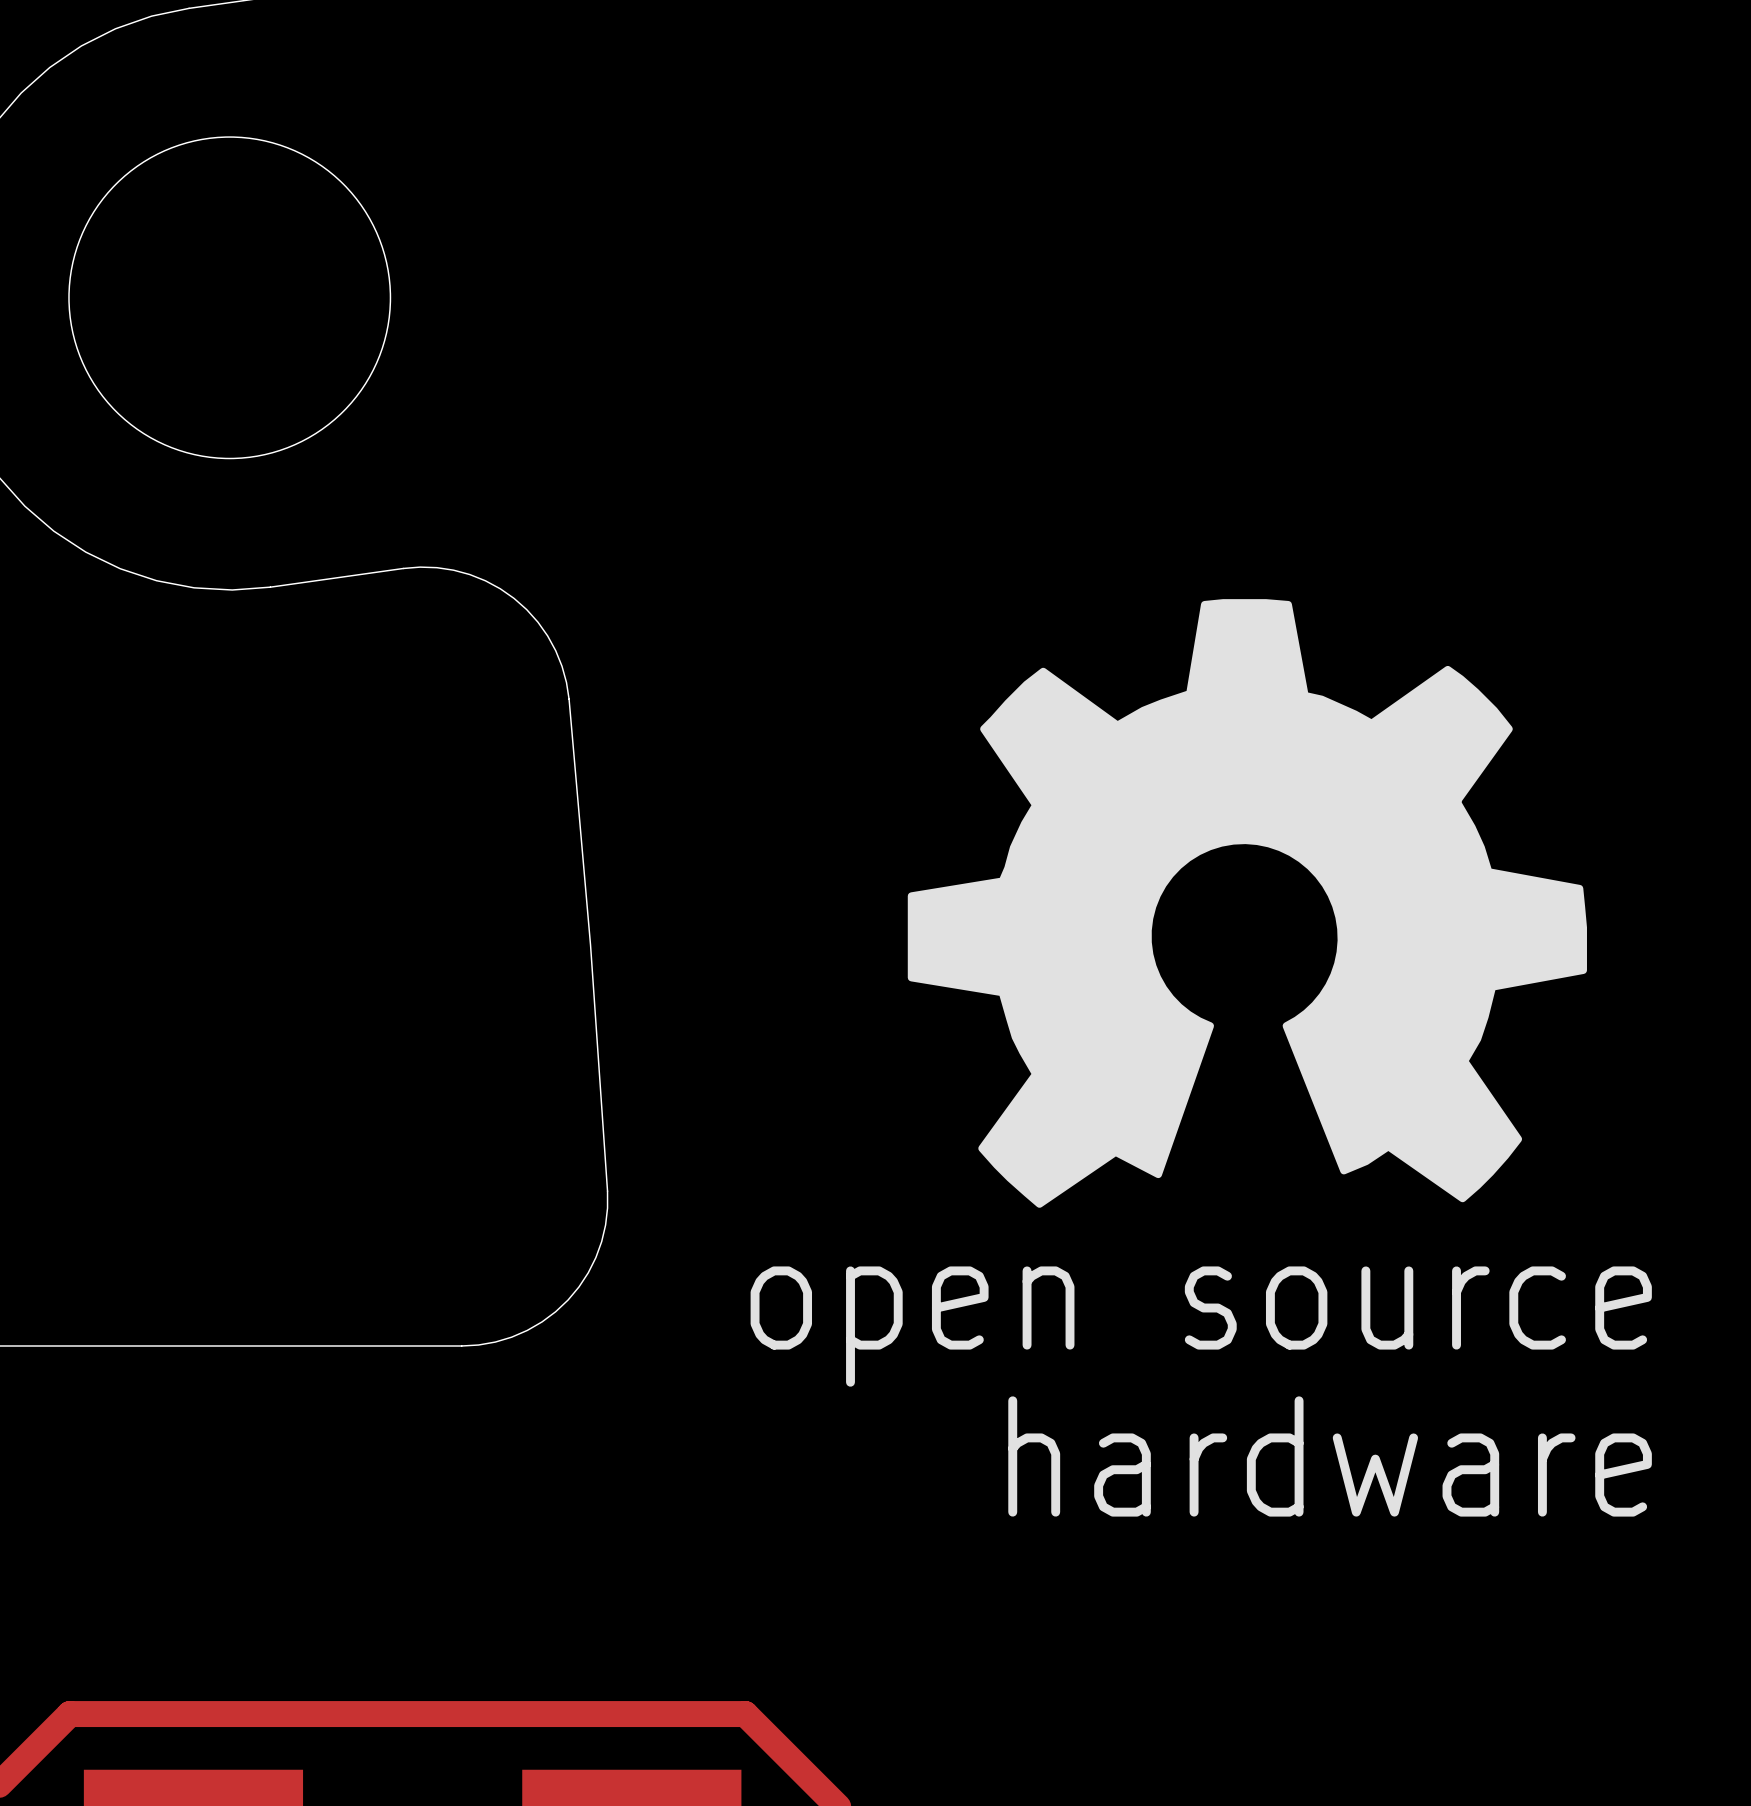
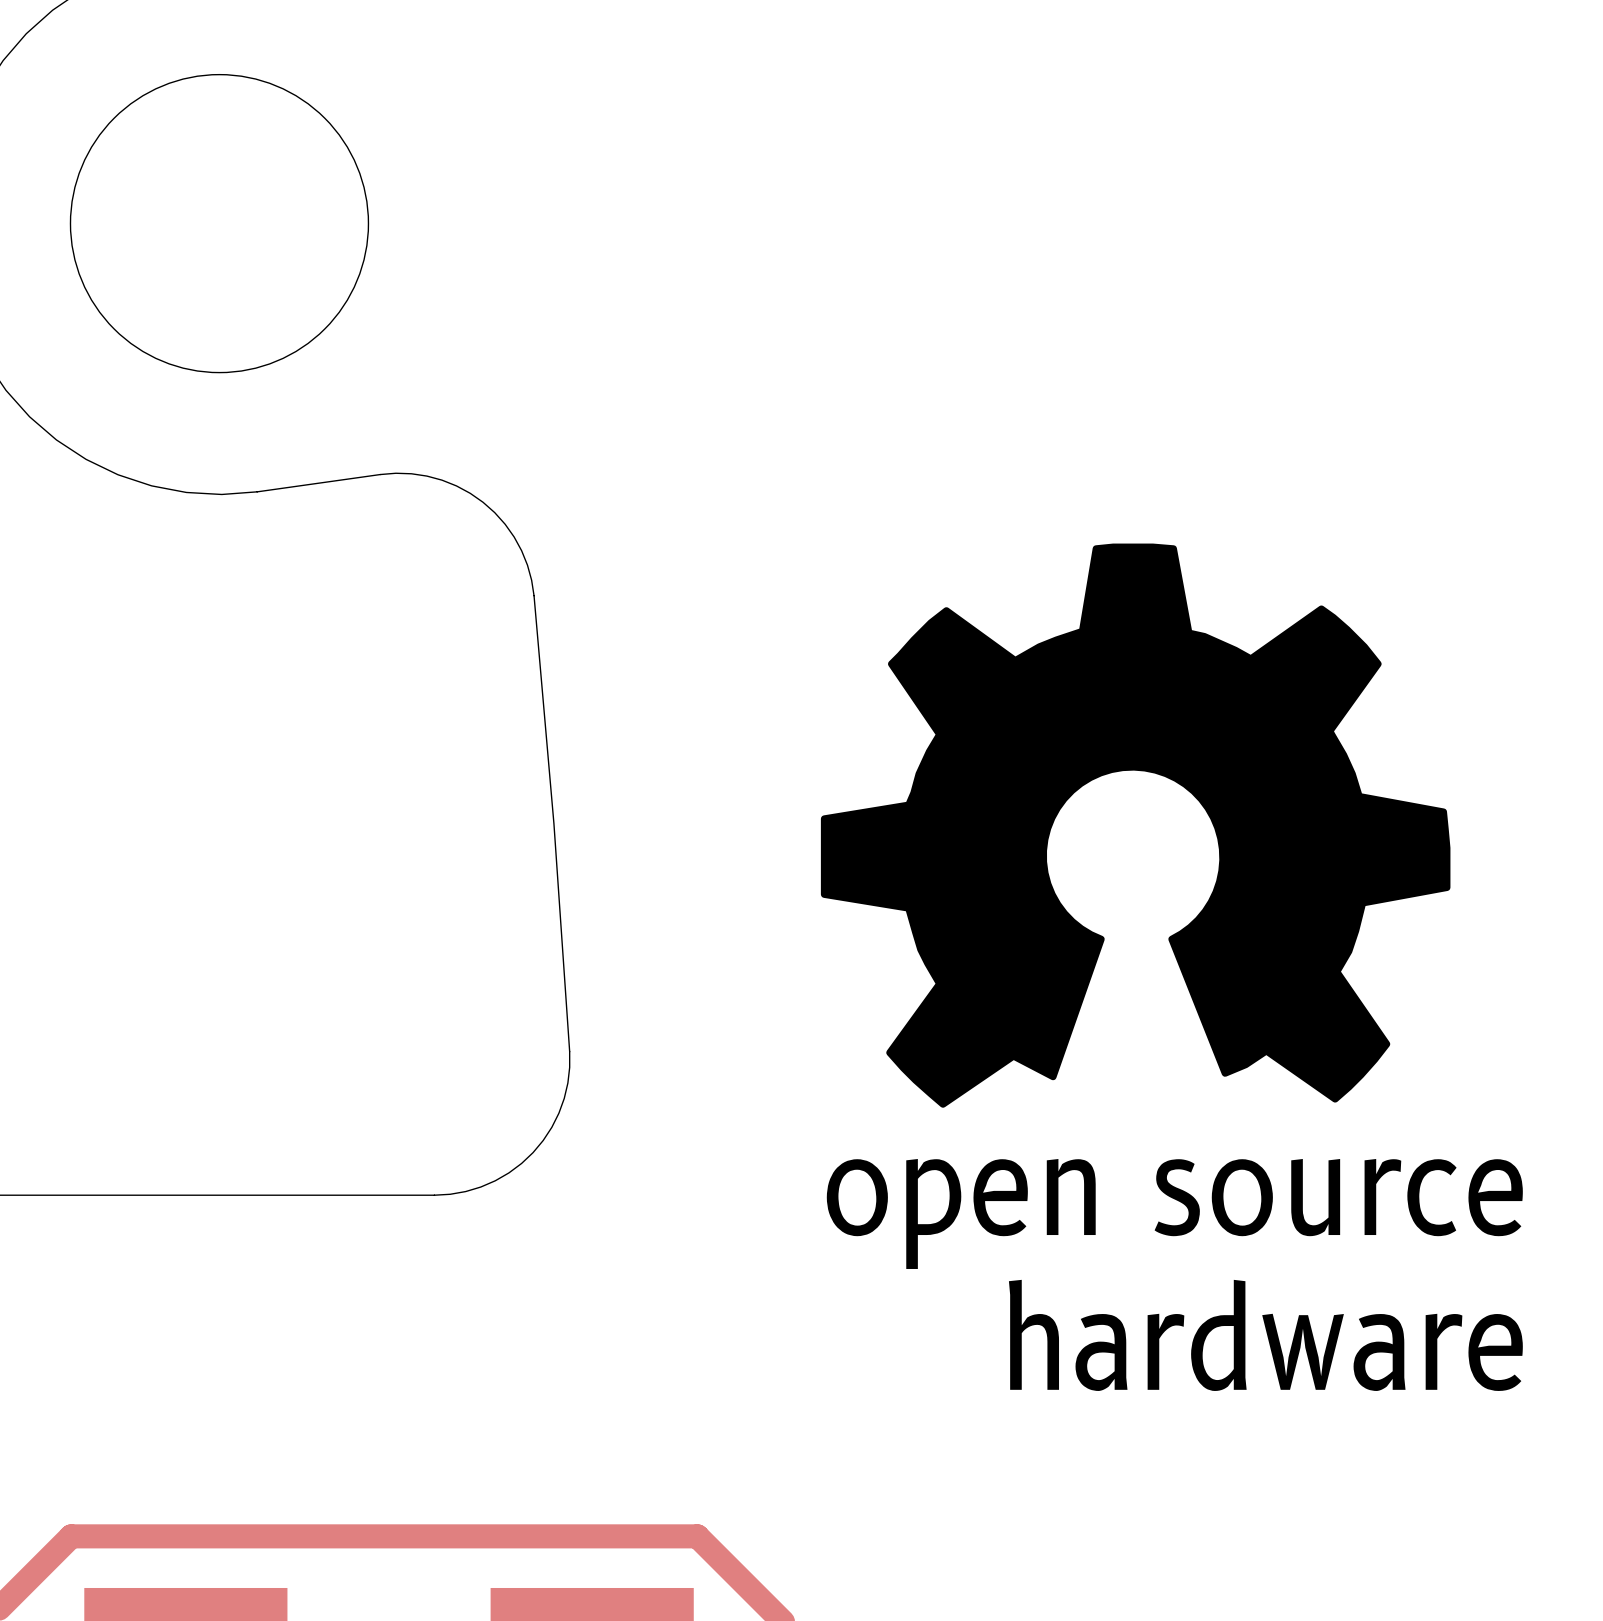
drawing position: (1247, 903) -> (1135, 825)

